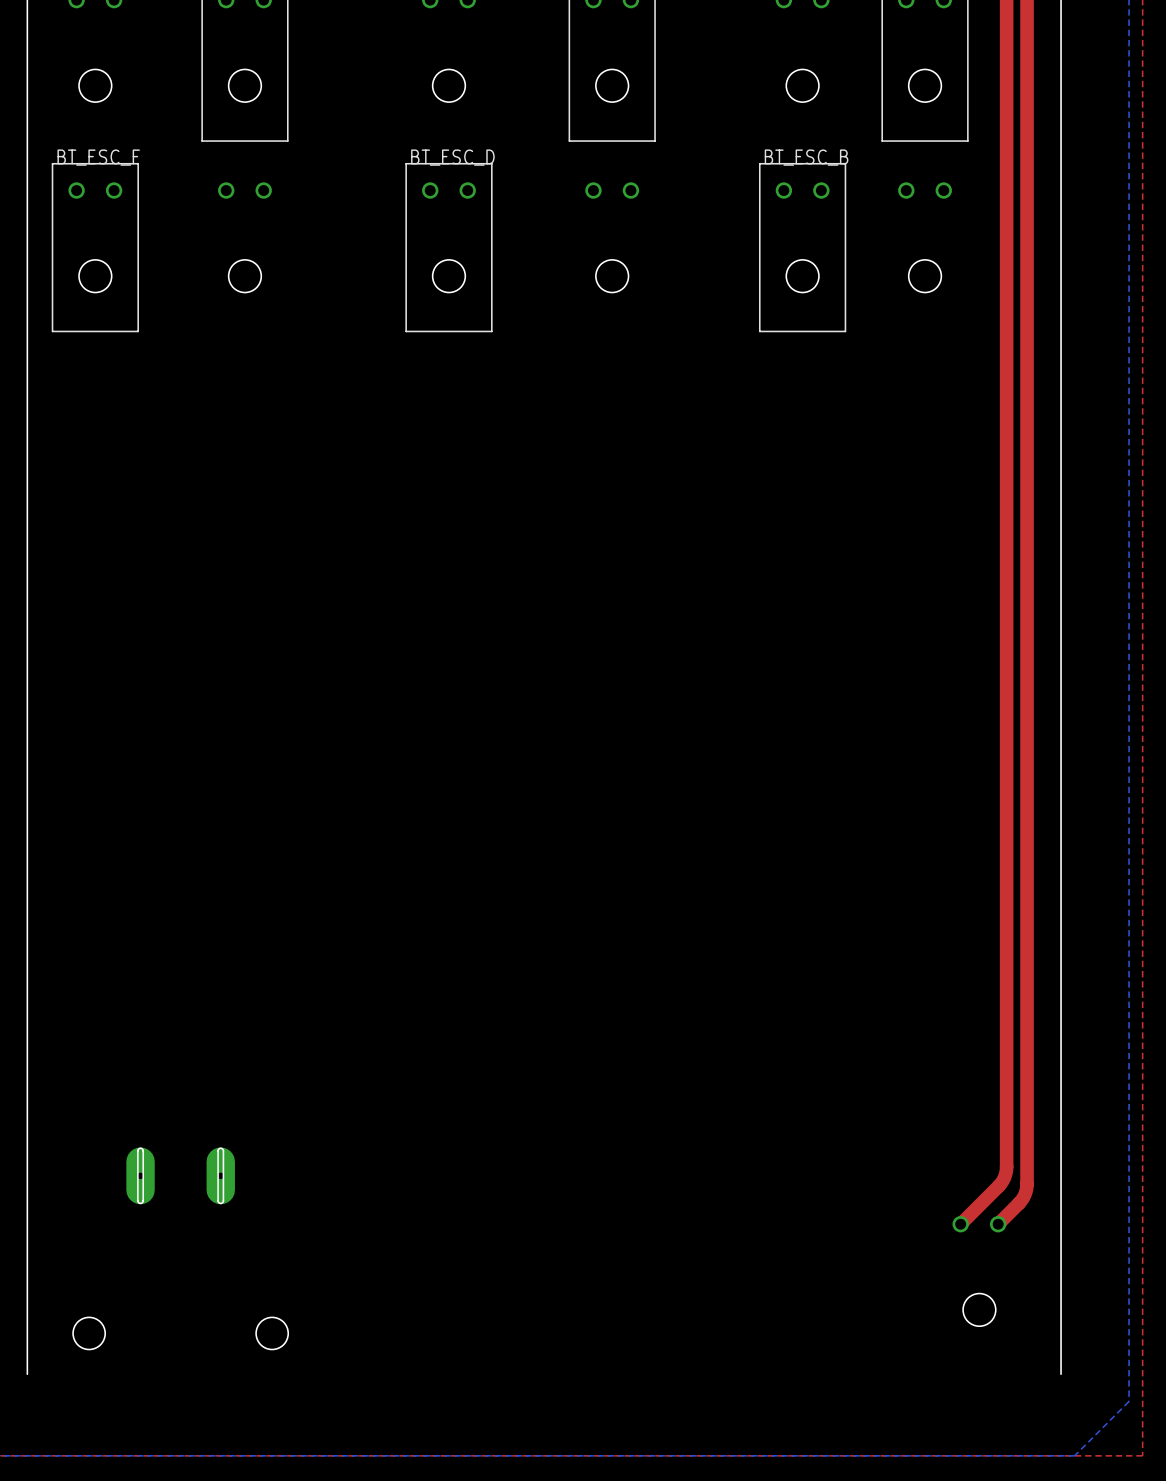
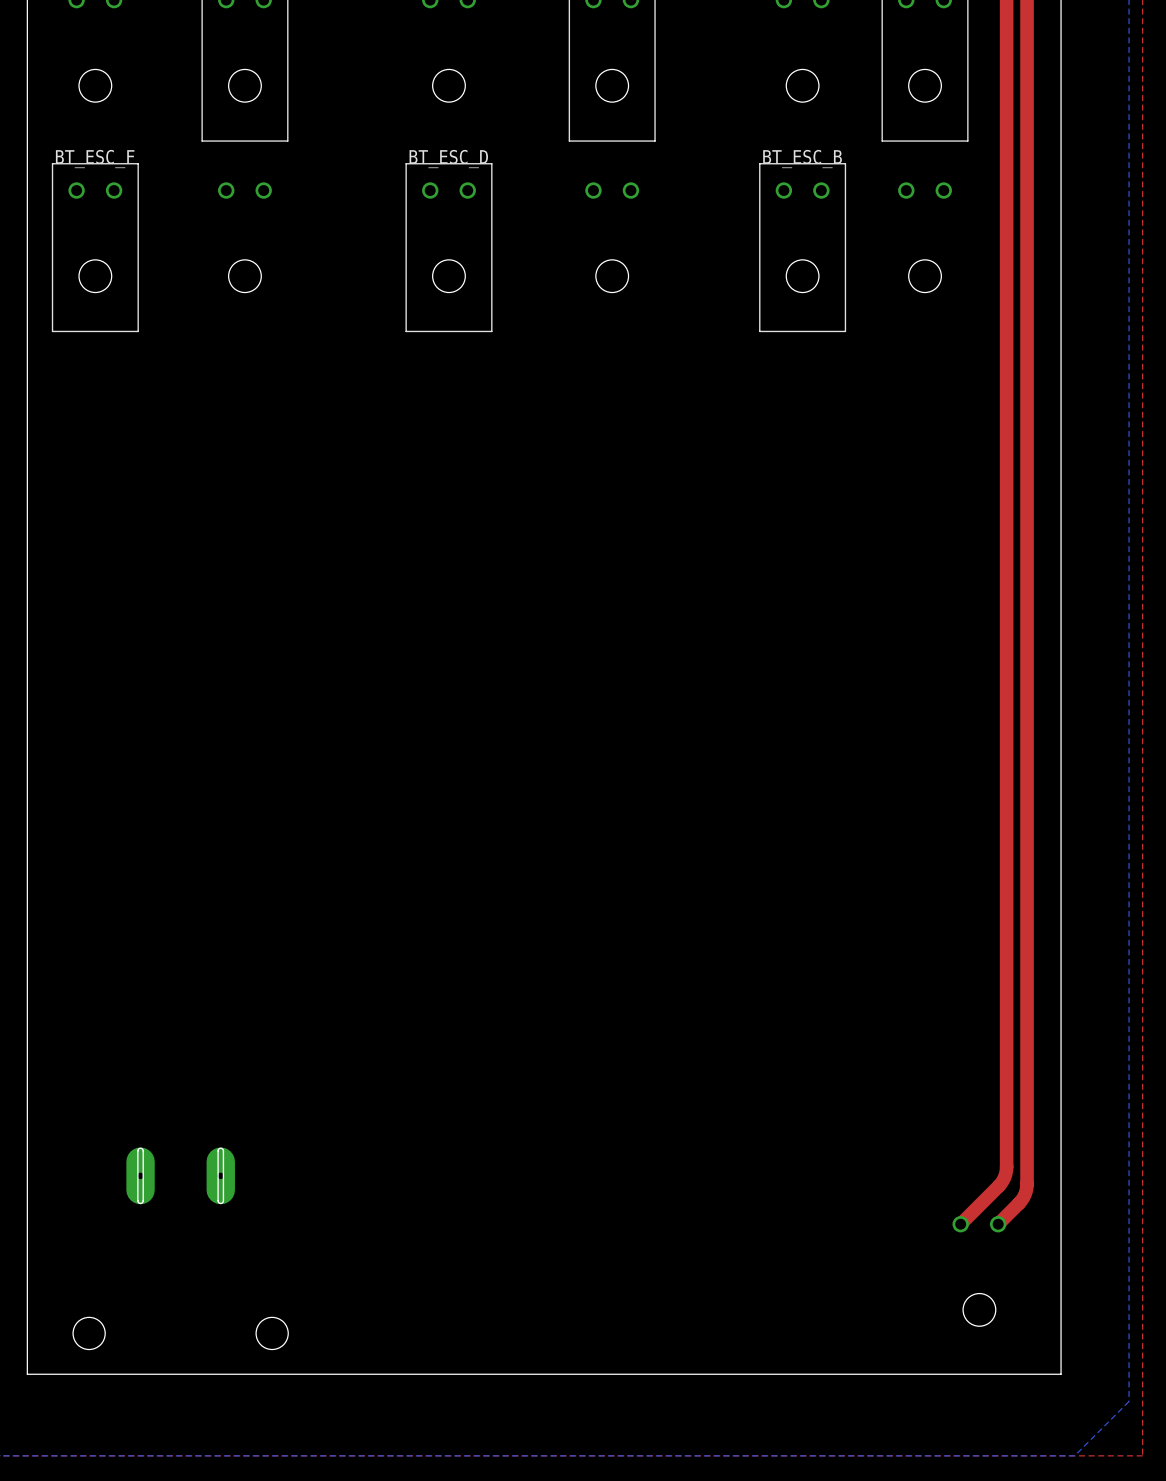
board edge: none -> (1061, 1374) (27, 1374)

